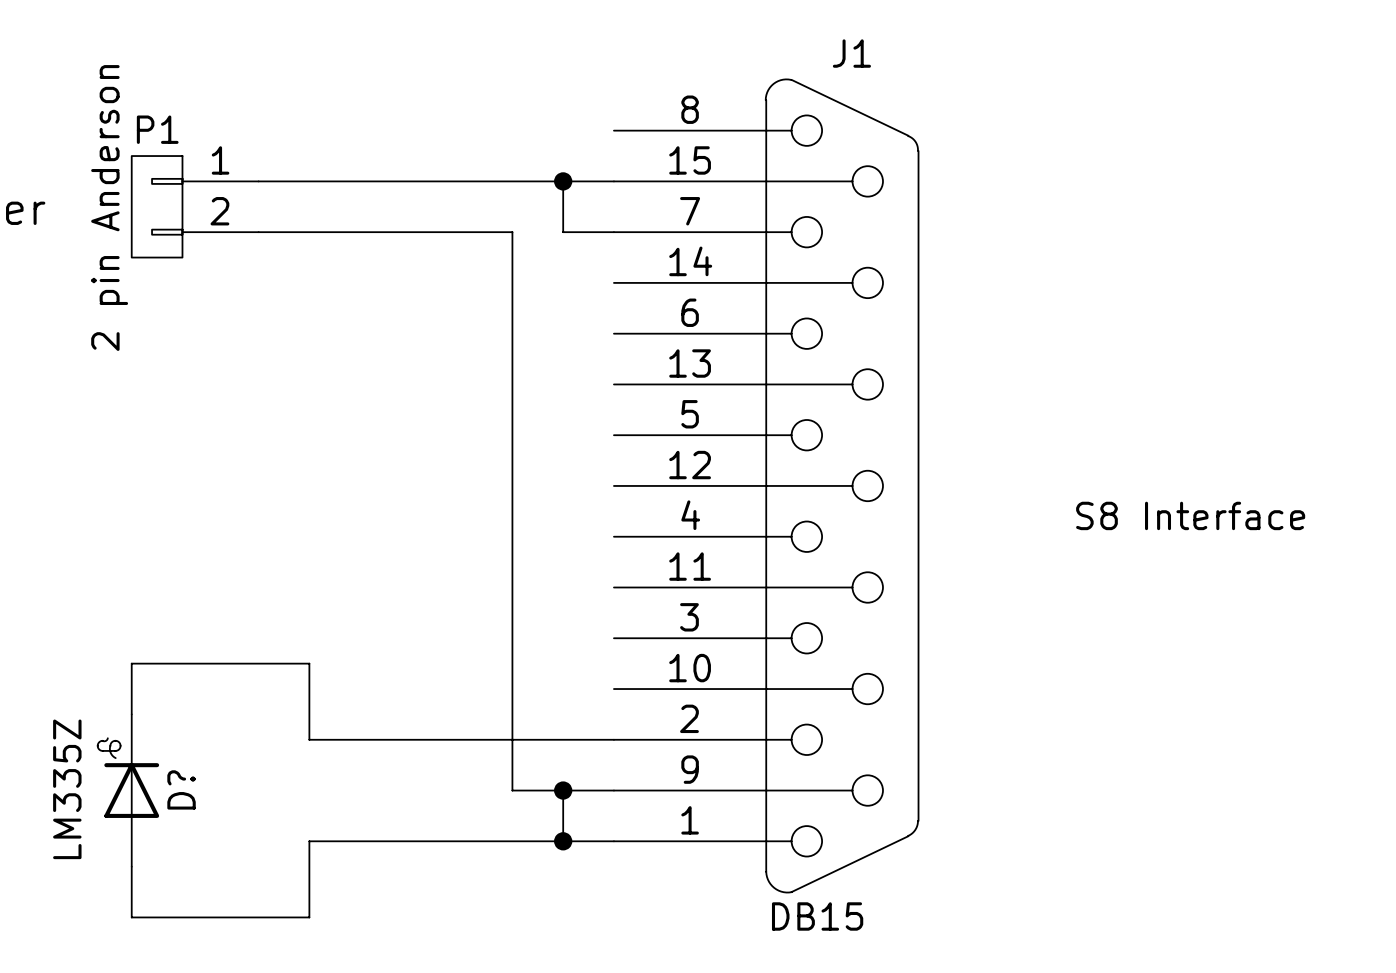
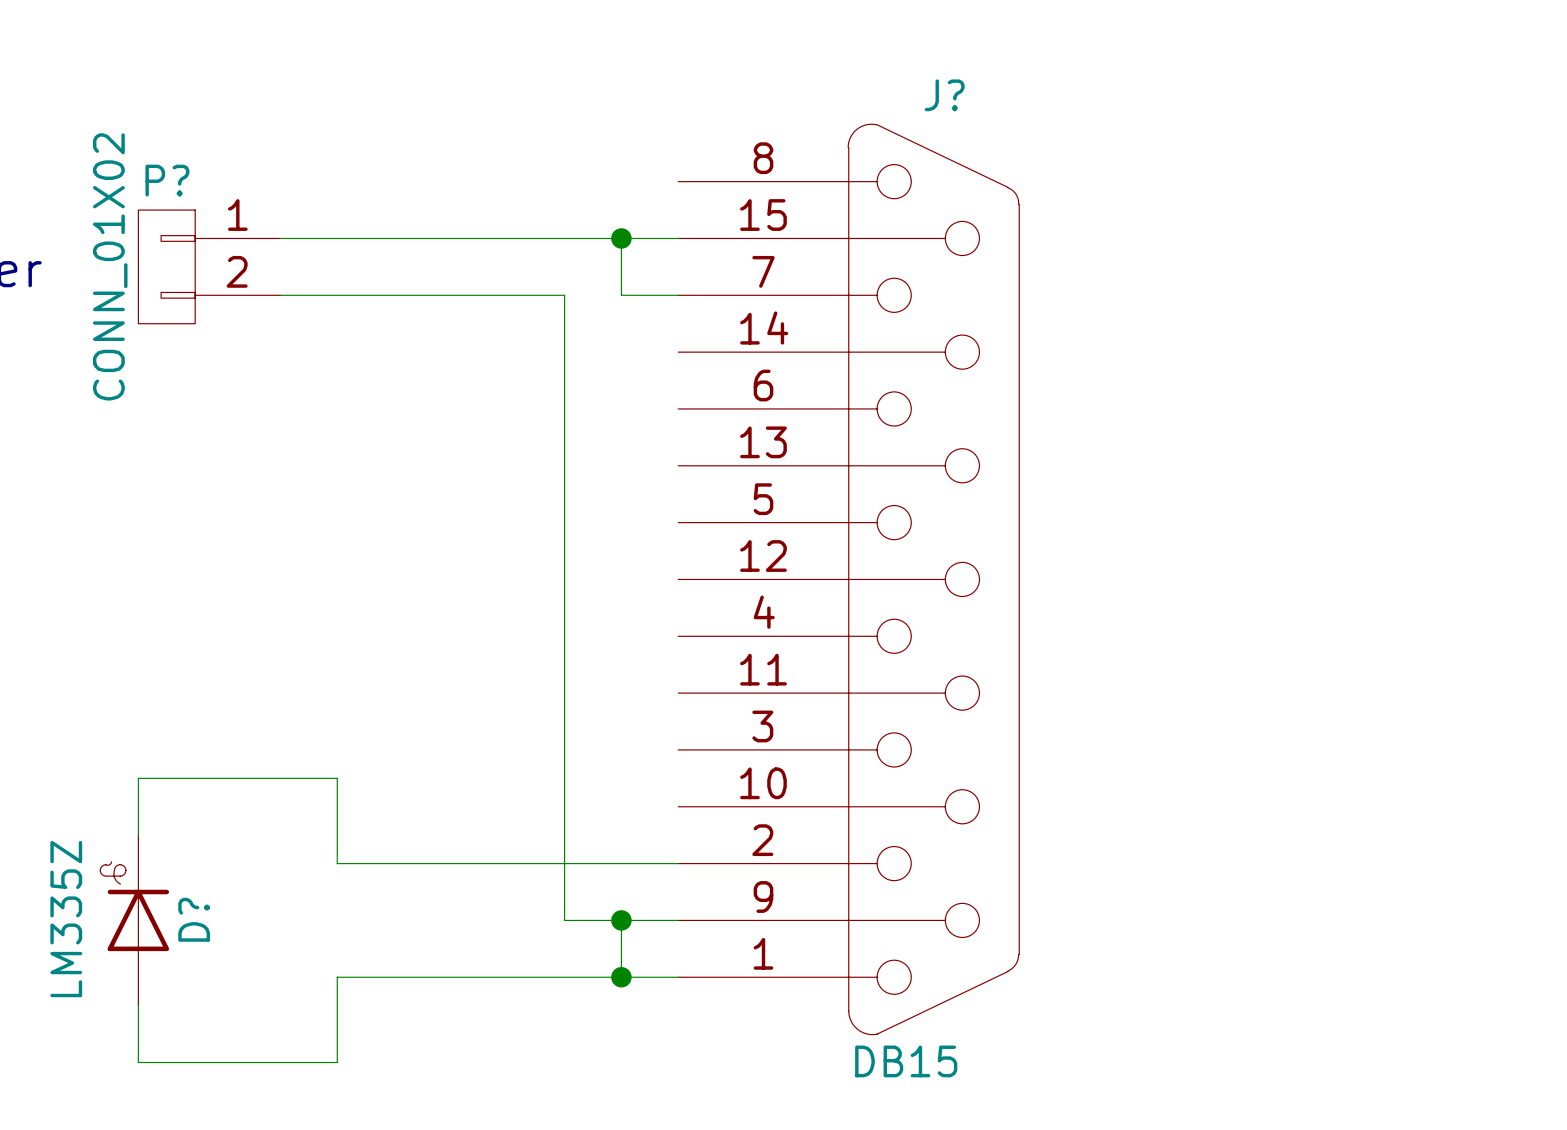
J1 name: J1 (851, 53) -> J? (944, 95)
P1 name: P1 (157, 129) -> P? (167, 180)
P1 value: 2 pin Anderson (109, 207) -> CONN_01X02 (110, 266)
text: S8 Interface (1190, 515) -> none

